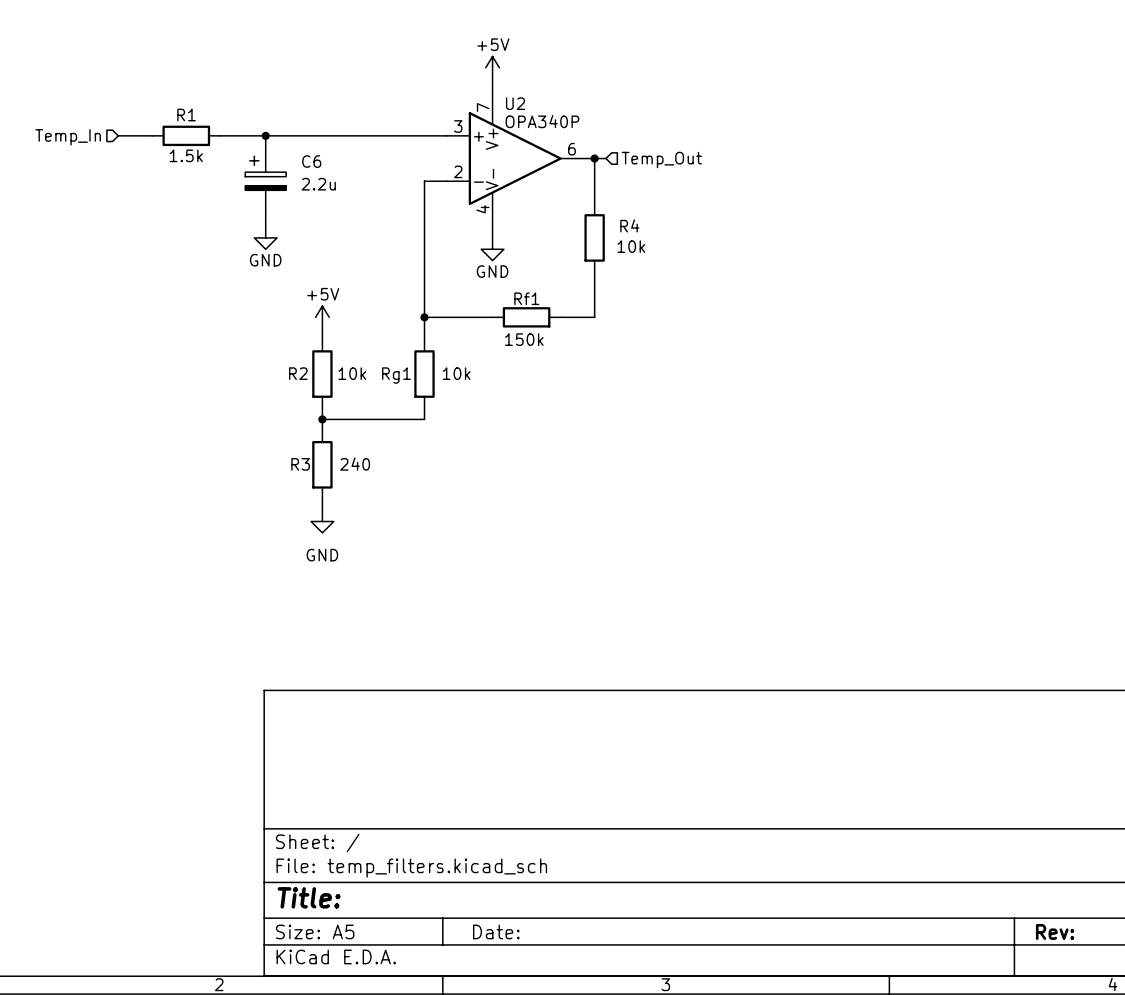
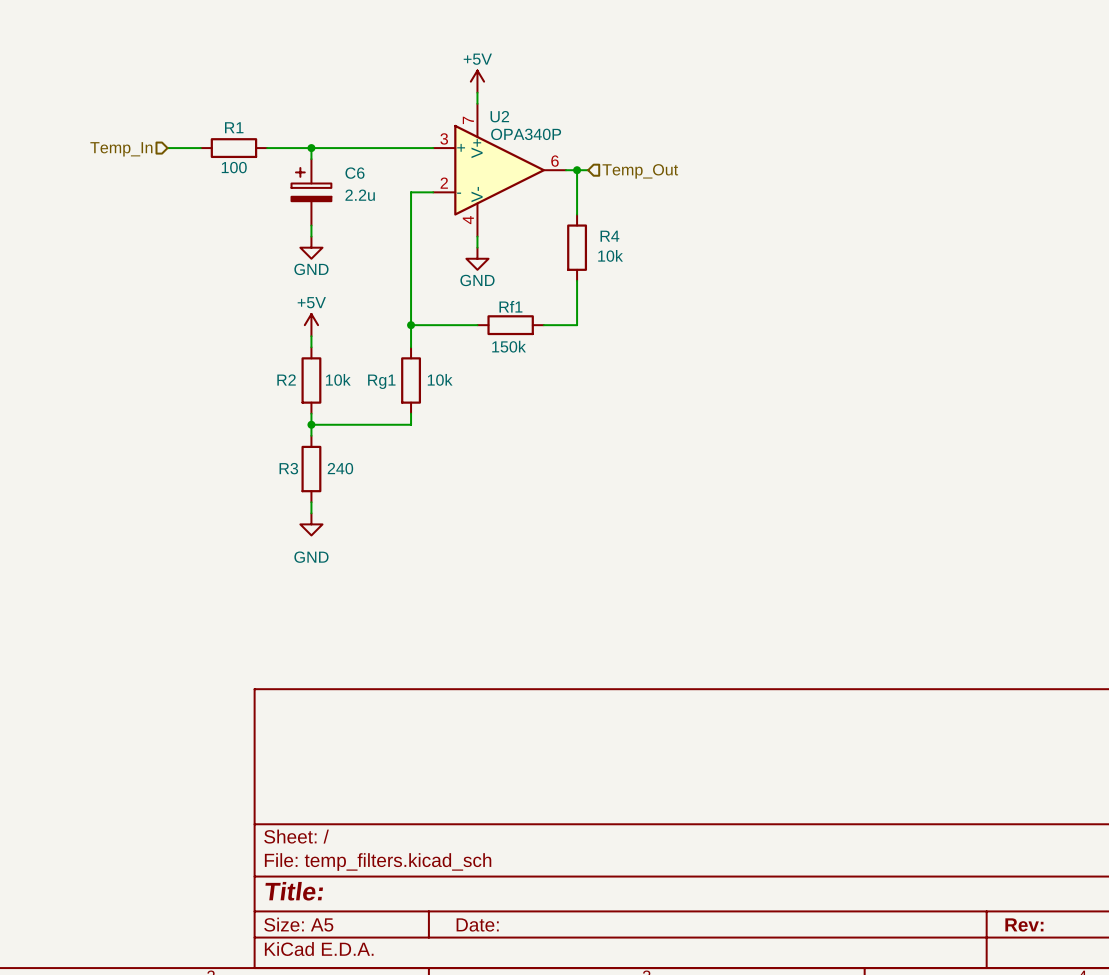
wire: (118, 135) (152, 135) -> (167, 148) (200, 148)
R1 position: (186, 135) -> (233, 148)
wire: (220, 135) (277, 135) -> none
junction: (265, 135) -> none
junction: none -> (311, 148)
hierarchical label position: Temp_In (68, 137) -> Temp_In (121, 149)
R1 value: 1.5k (186, 155) -> 100 (234, 167)
C6 position: (265, 181) -> (311, 192)
wire: (265, 215) (265, 226) -> (311, 225) (311, 236)
power symbol position: GND (265, 237) -> GND (311, 247)

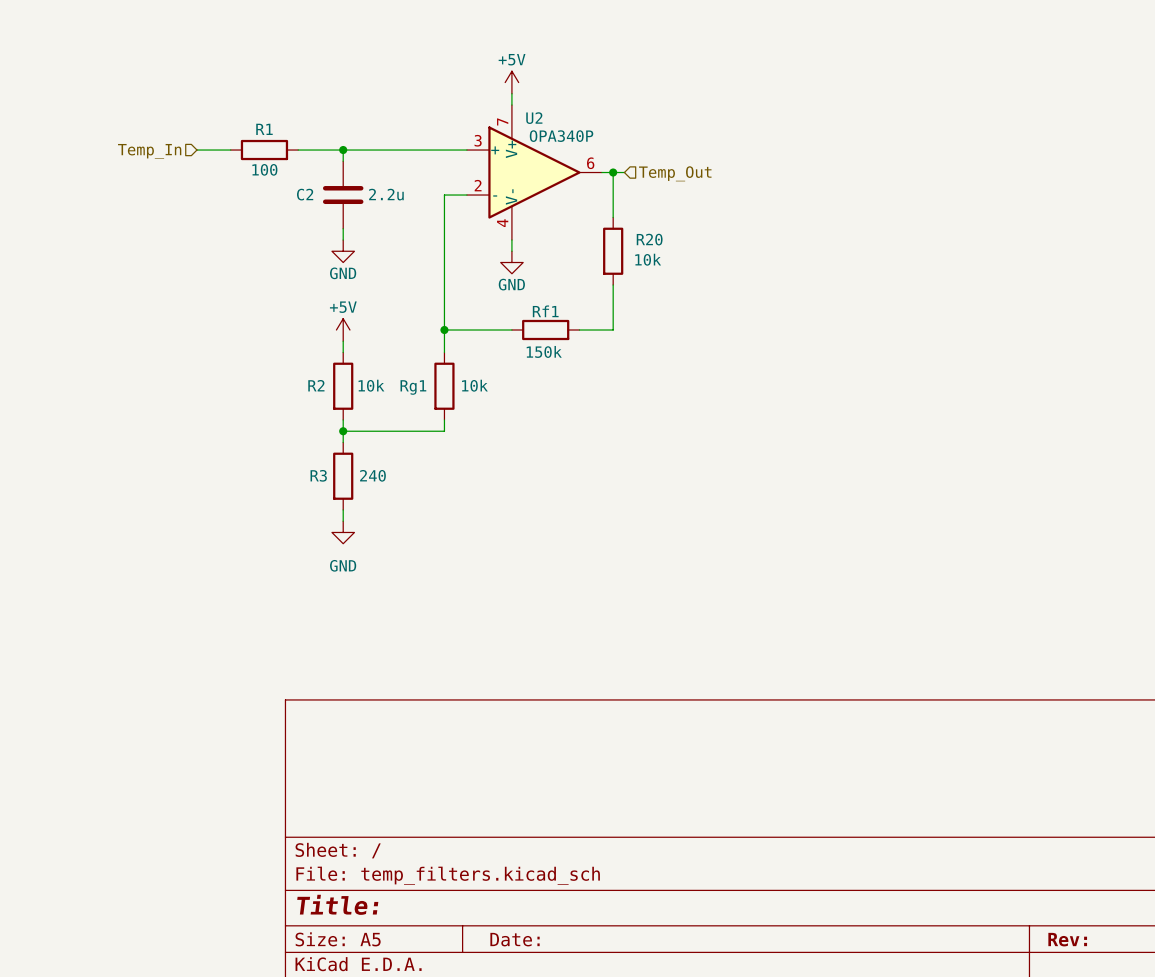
C6: 2.2u (311, 192) -> none
C2: none -> 2.2u (343, 195)
R4 name: R4 (609, 236) -> R20 (649, 239)

